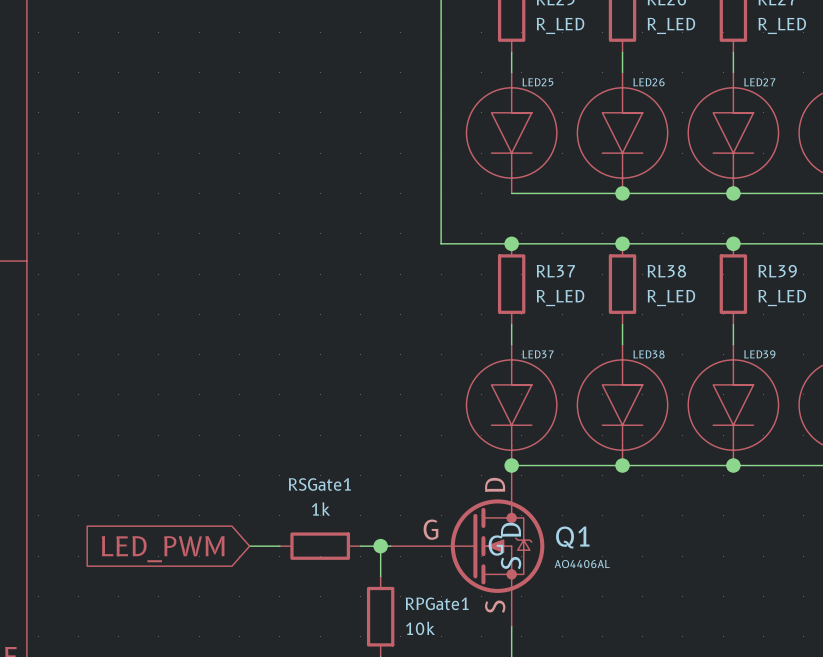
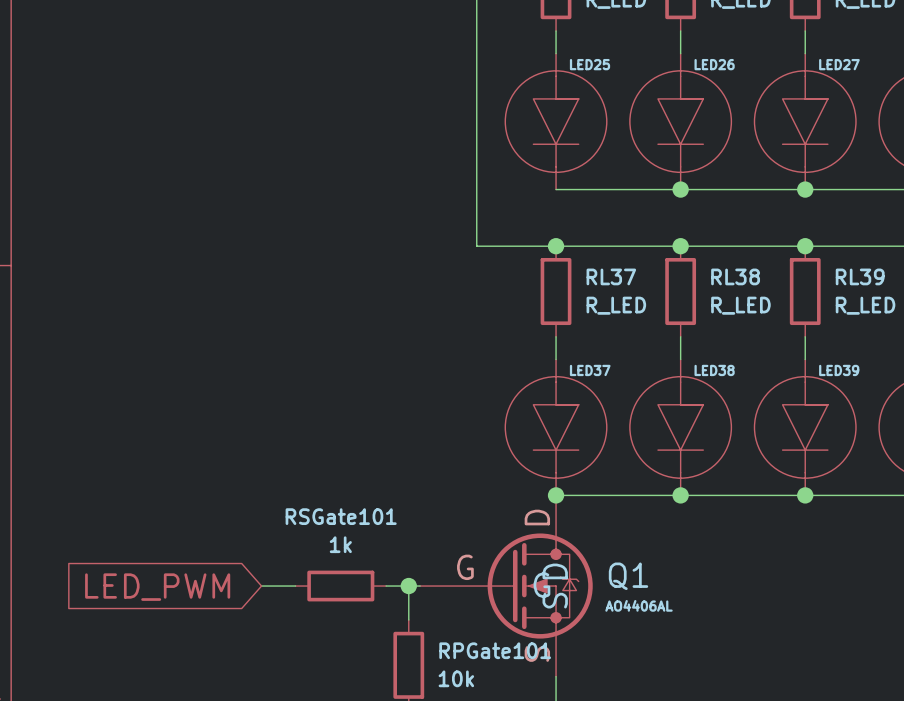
RSGate1 name: RSGate1 (319, 484) -> RSGate101 (341, 516)
RPGate1 name: RPGate1 (437, 603) -> RPGate101 (495, 650)

